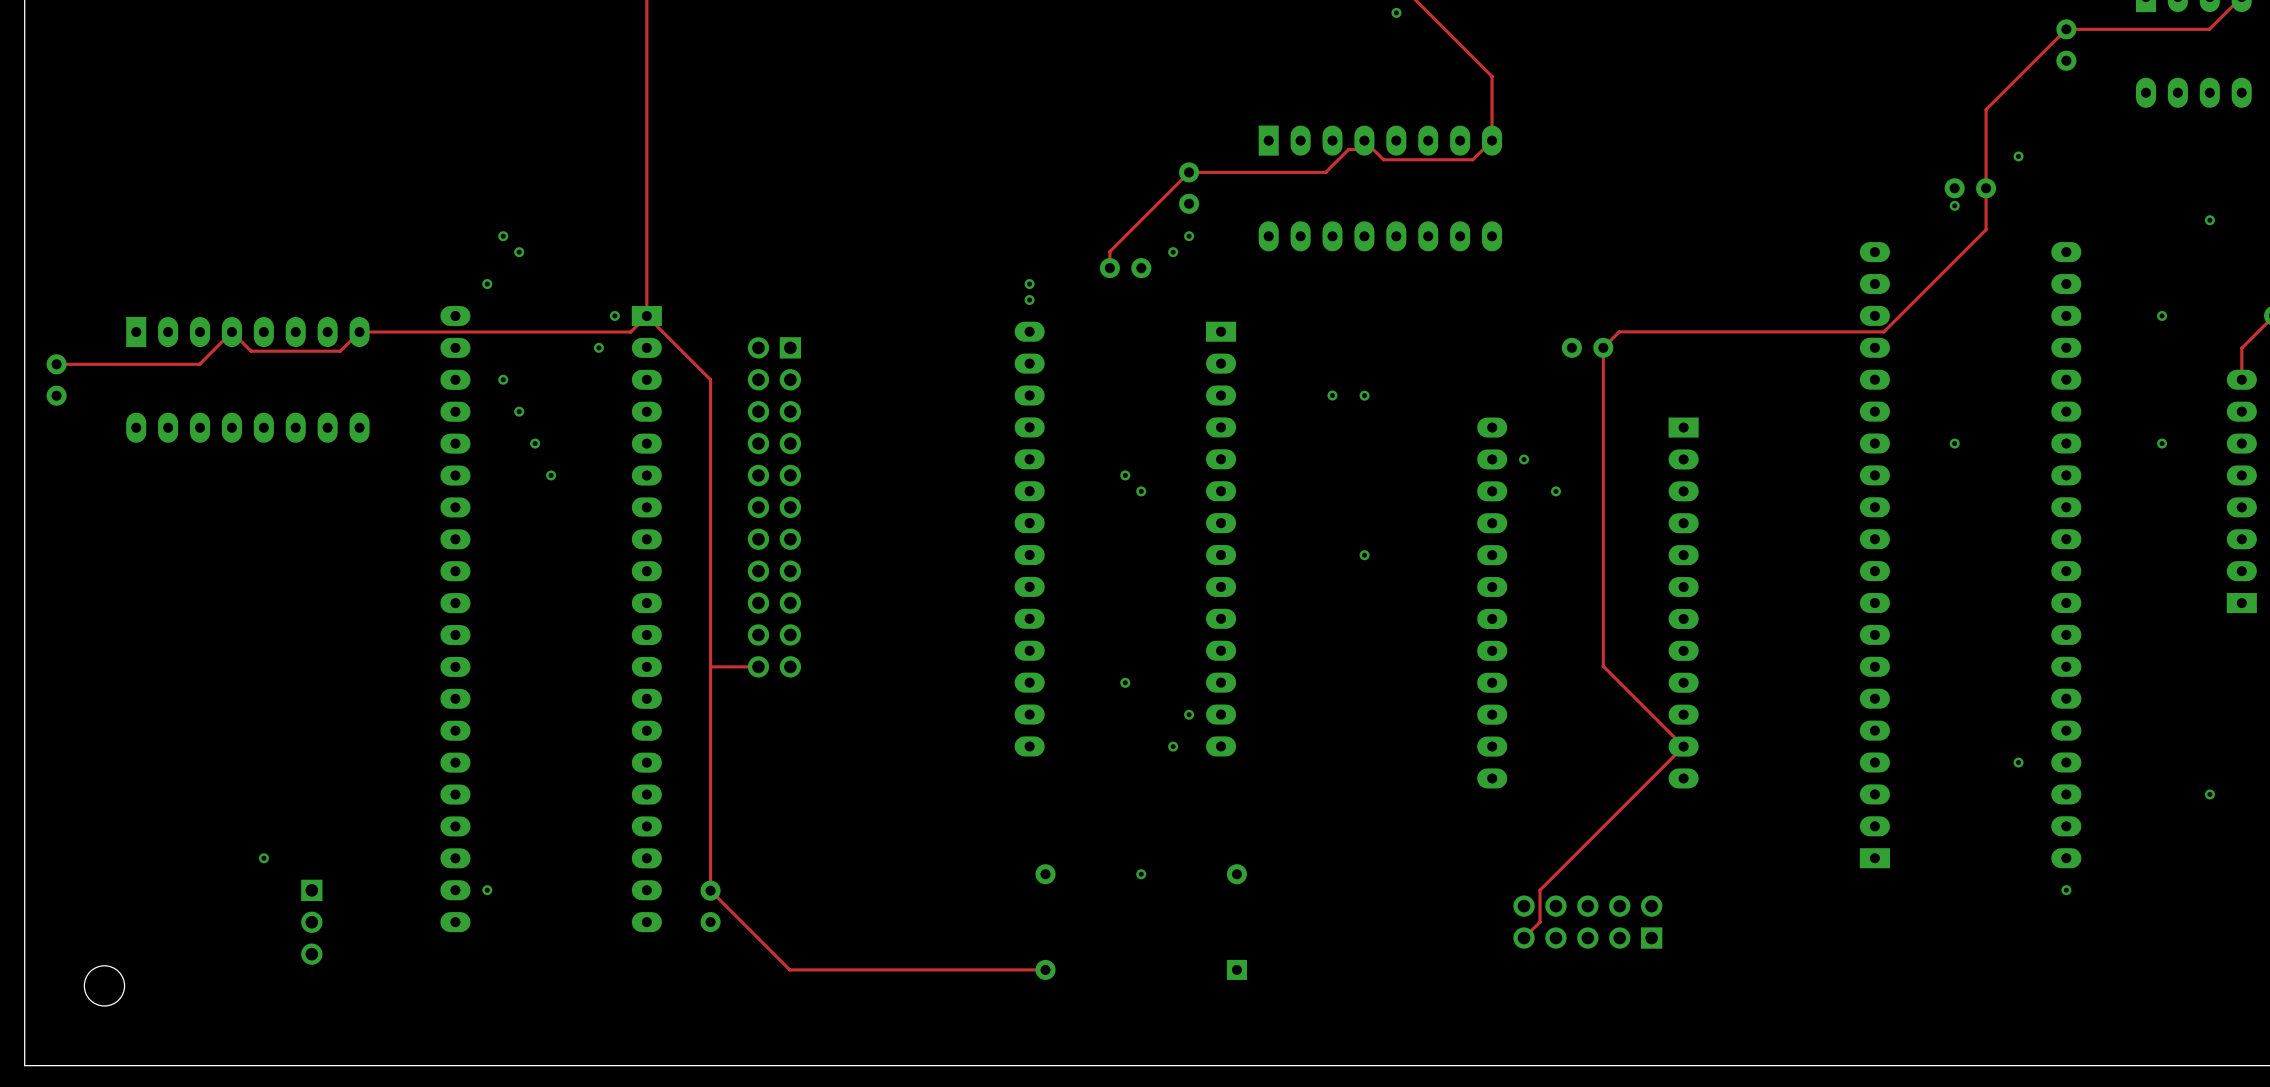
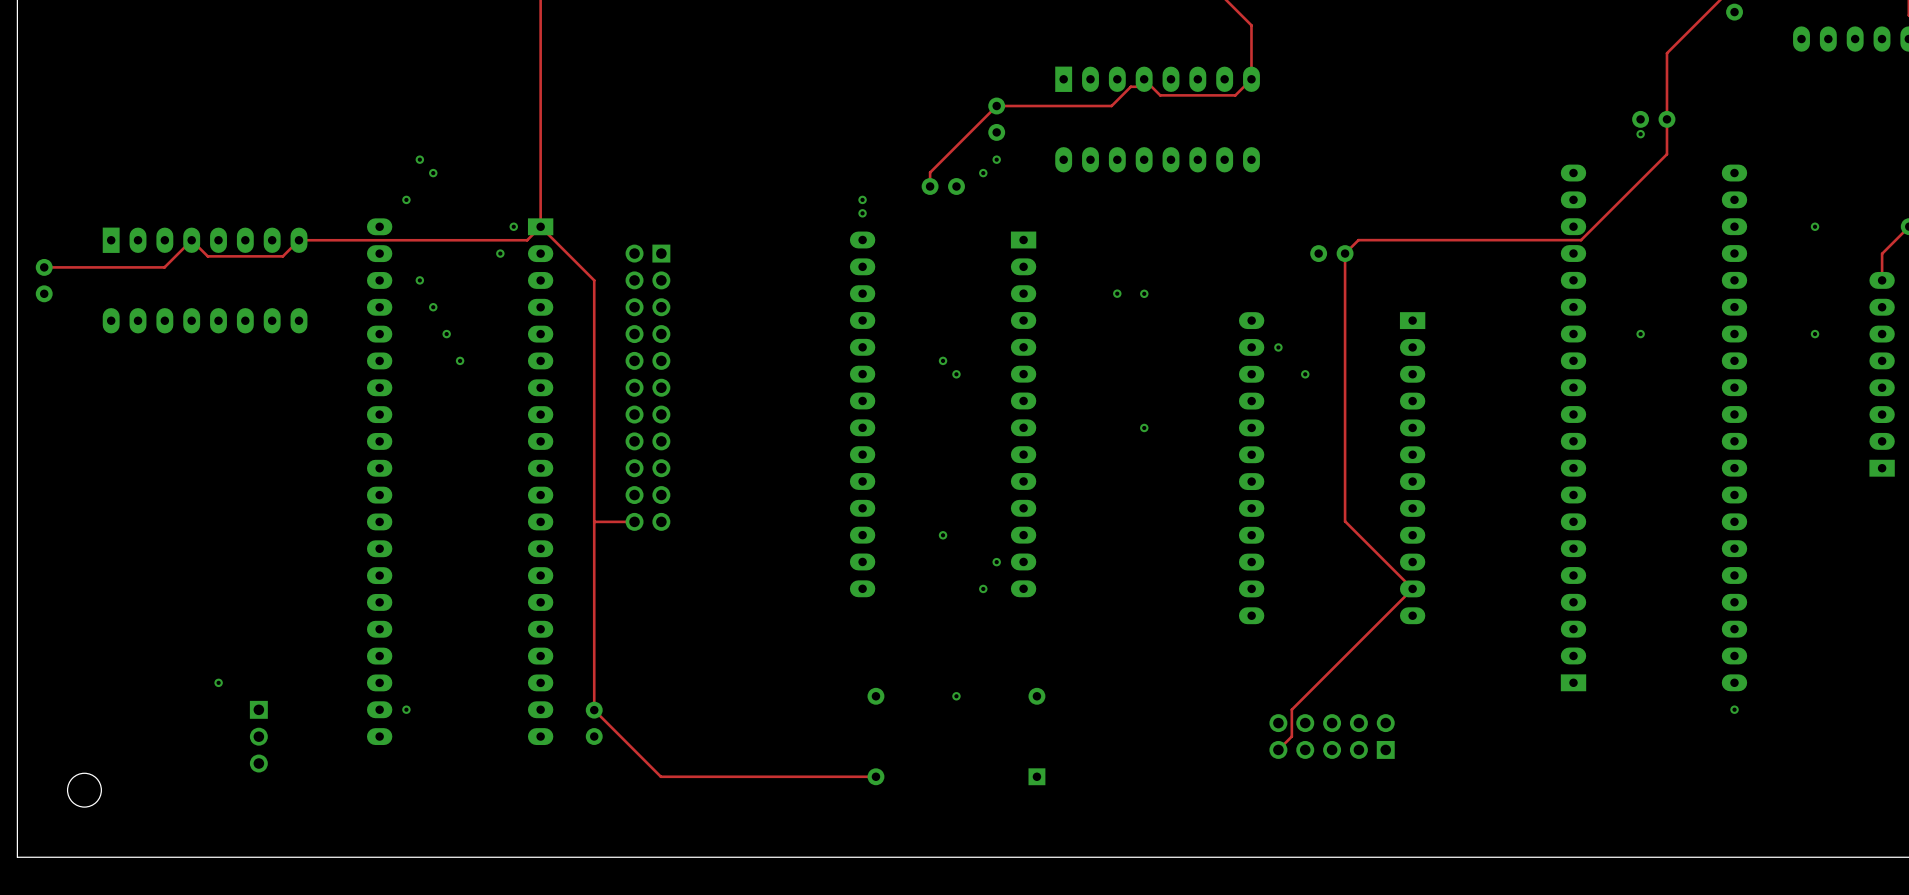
via: (2018, 156) -> none
via: (2209, 220) -> none
via: (2018, 762) -> none
via: (2209, 794) -> none

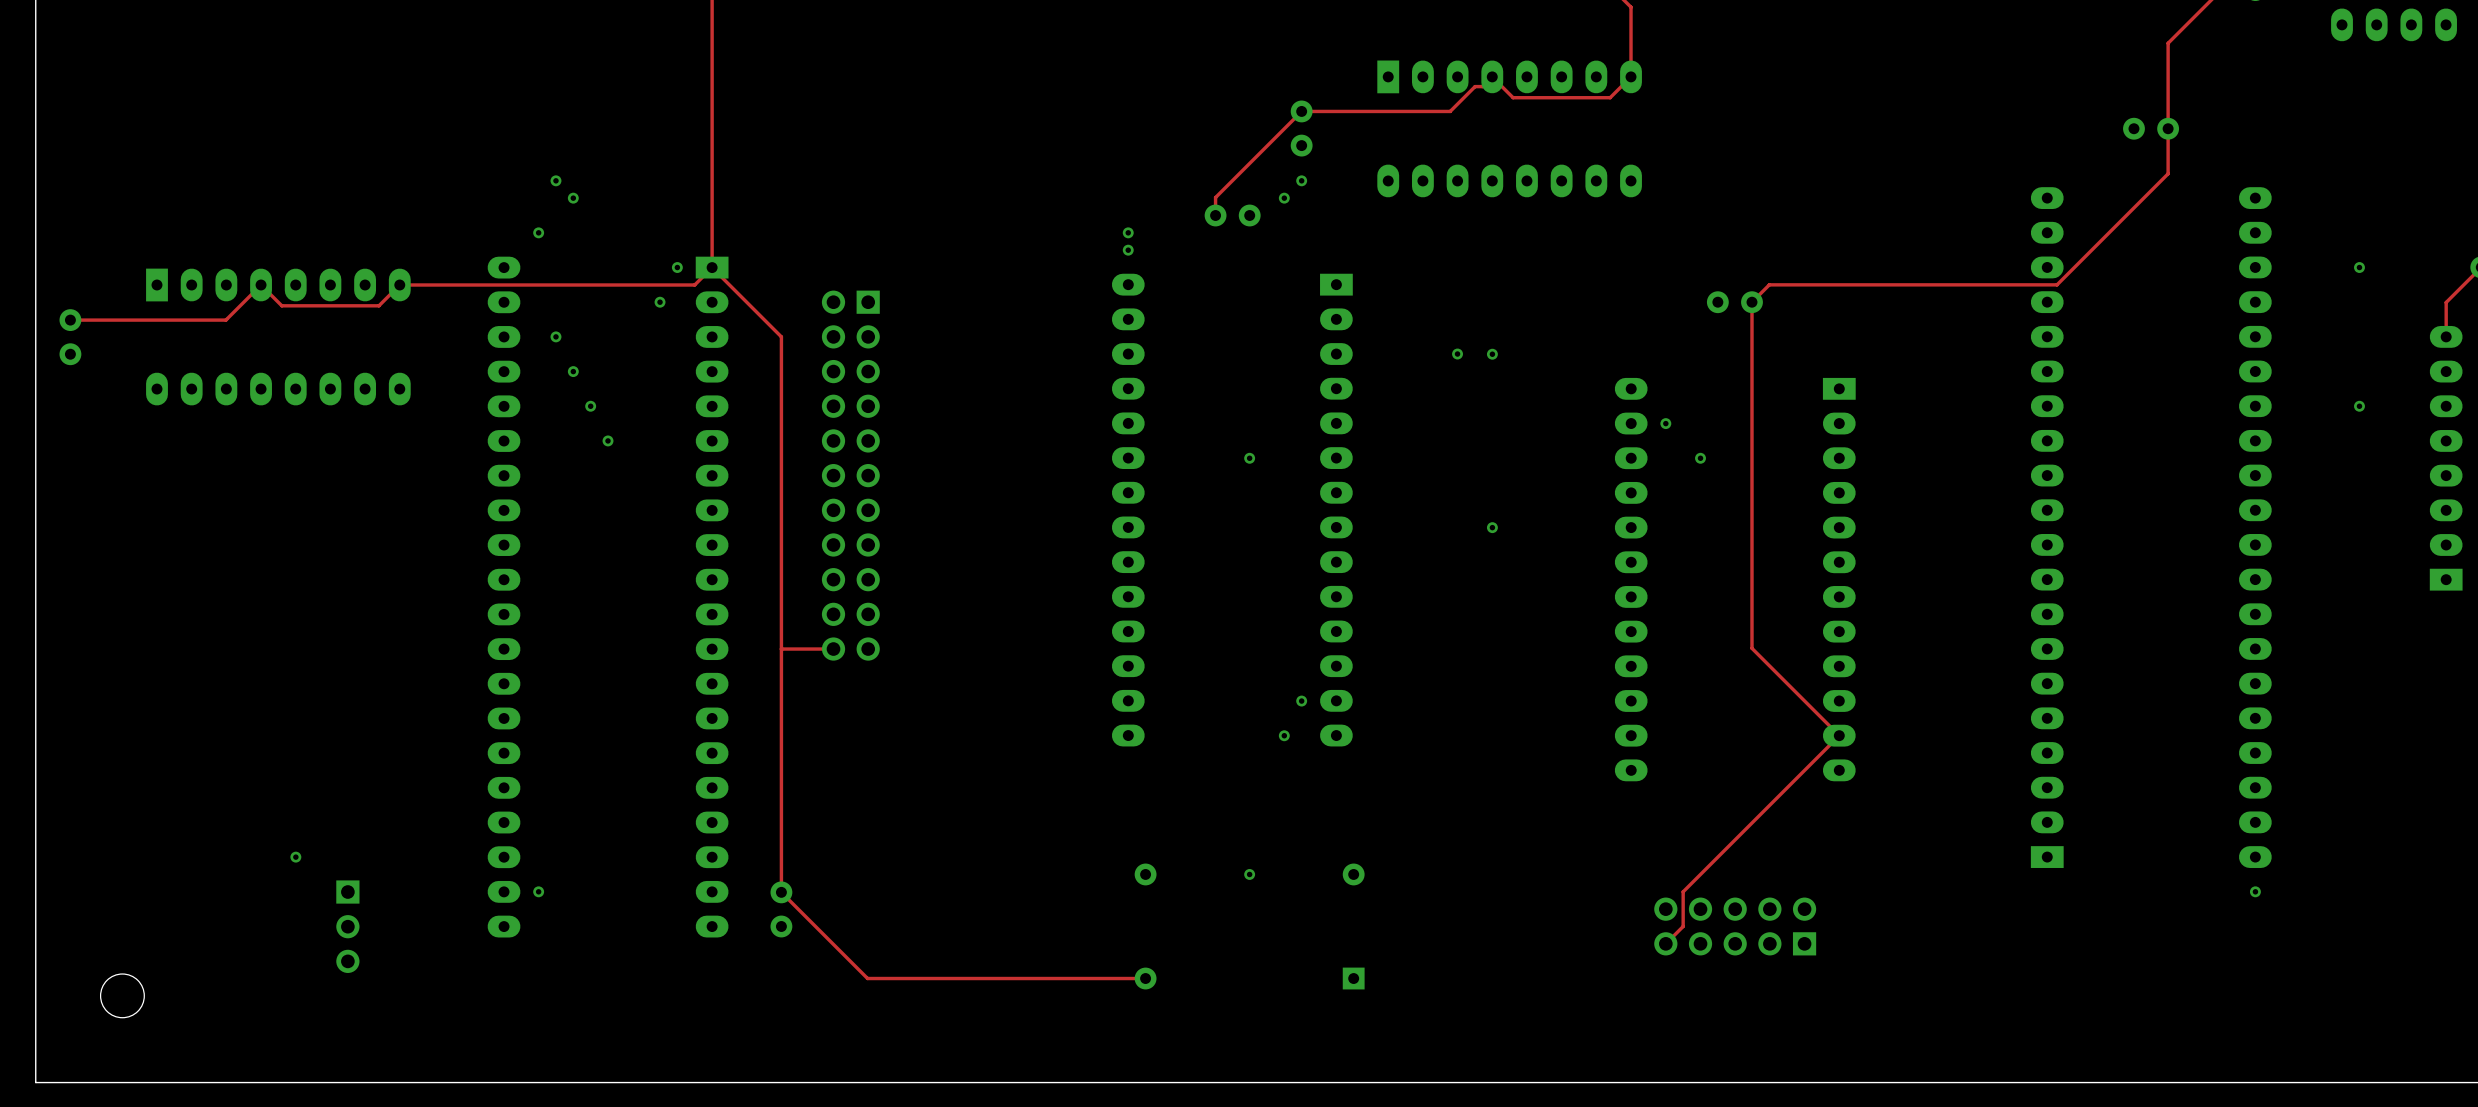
via: (1640, 134) -> none
via: (1640, 334) -> none
via: (943, 360) -> none
via: (943, 535) -> none

